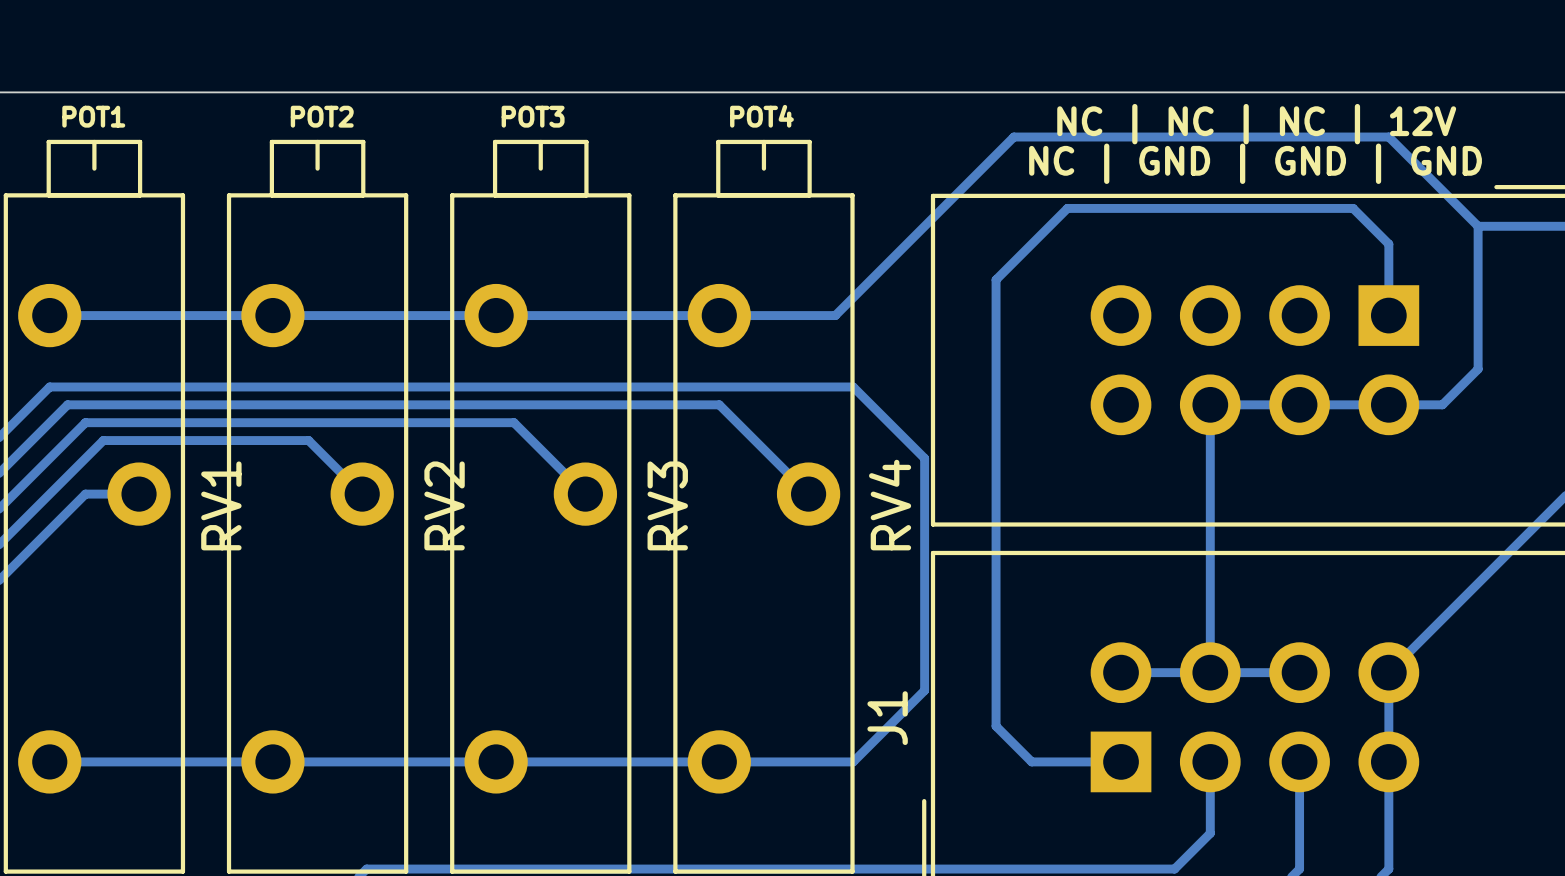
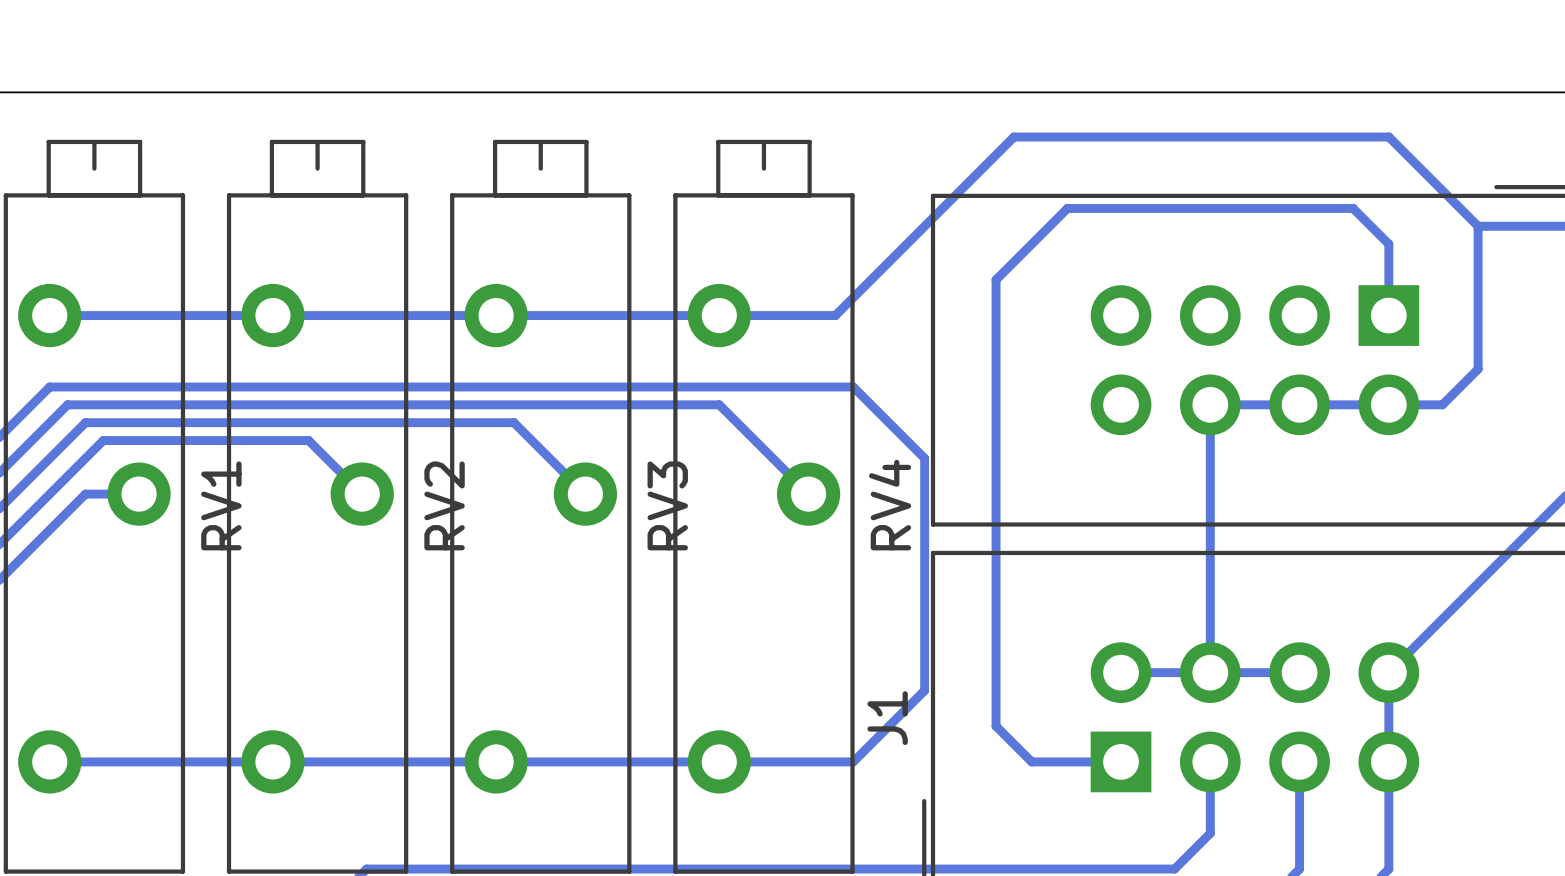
text: POT1 (93, 116) -> none
text: POT2 (322, 116) -> none
text: POT3 (533, 116) -> none
text: POT4 (761, 116) -> none
text: NC | NC | NC | 12V (1256, 124) -> none
text: NC | GND | GND | GND (1255, 163) -> none

